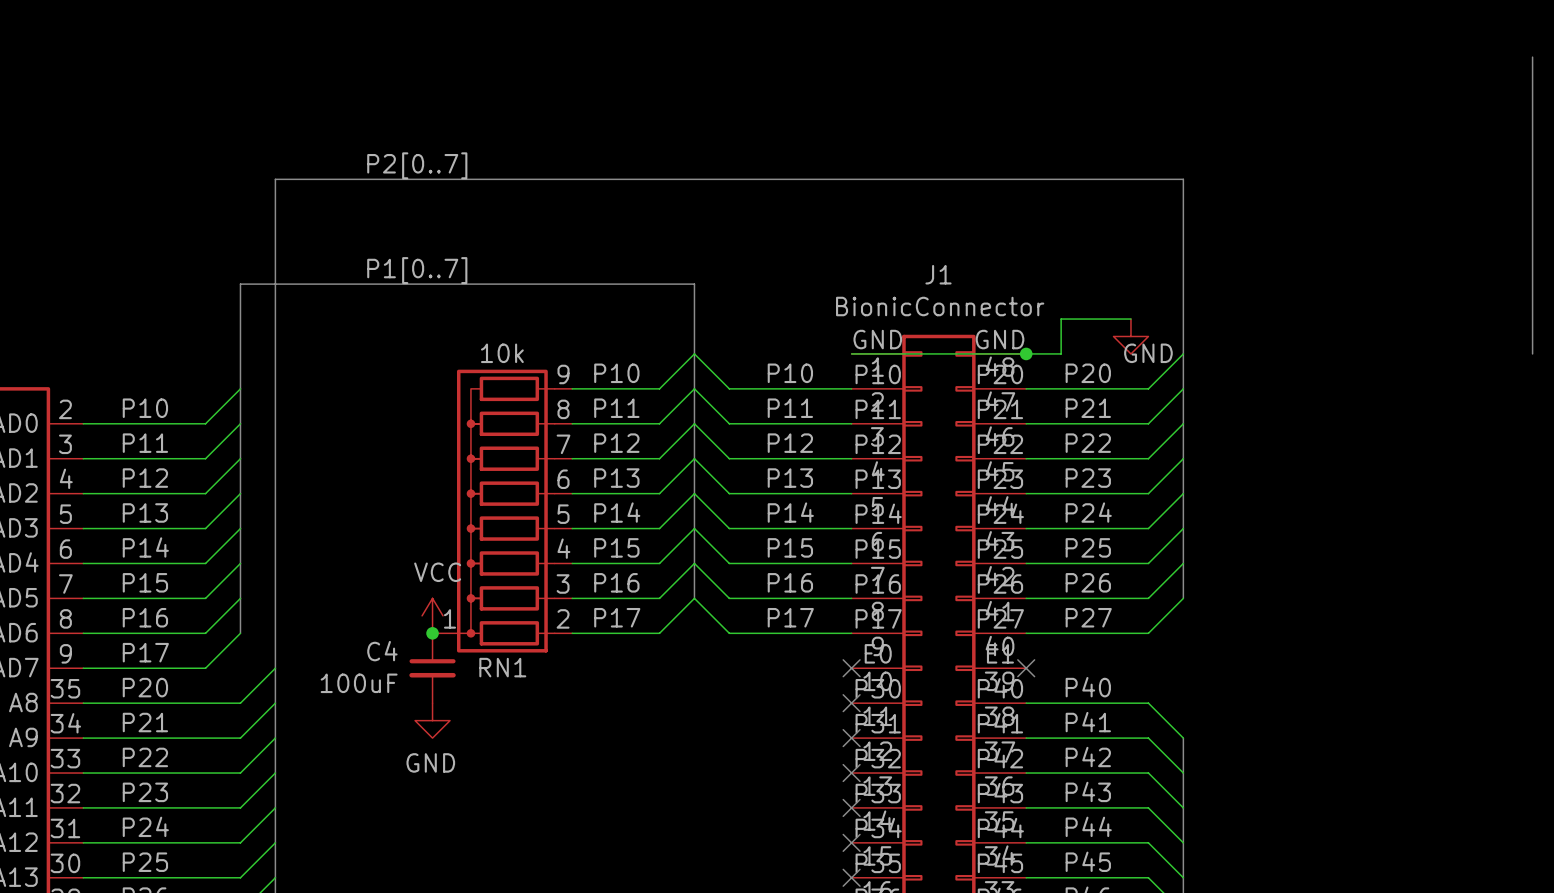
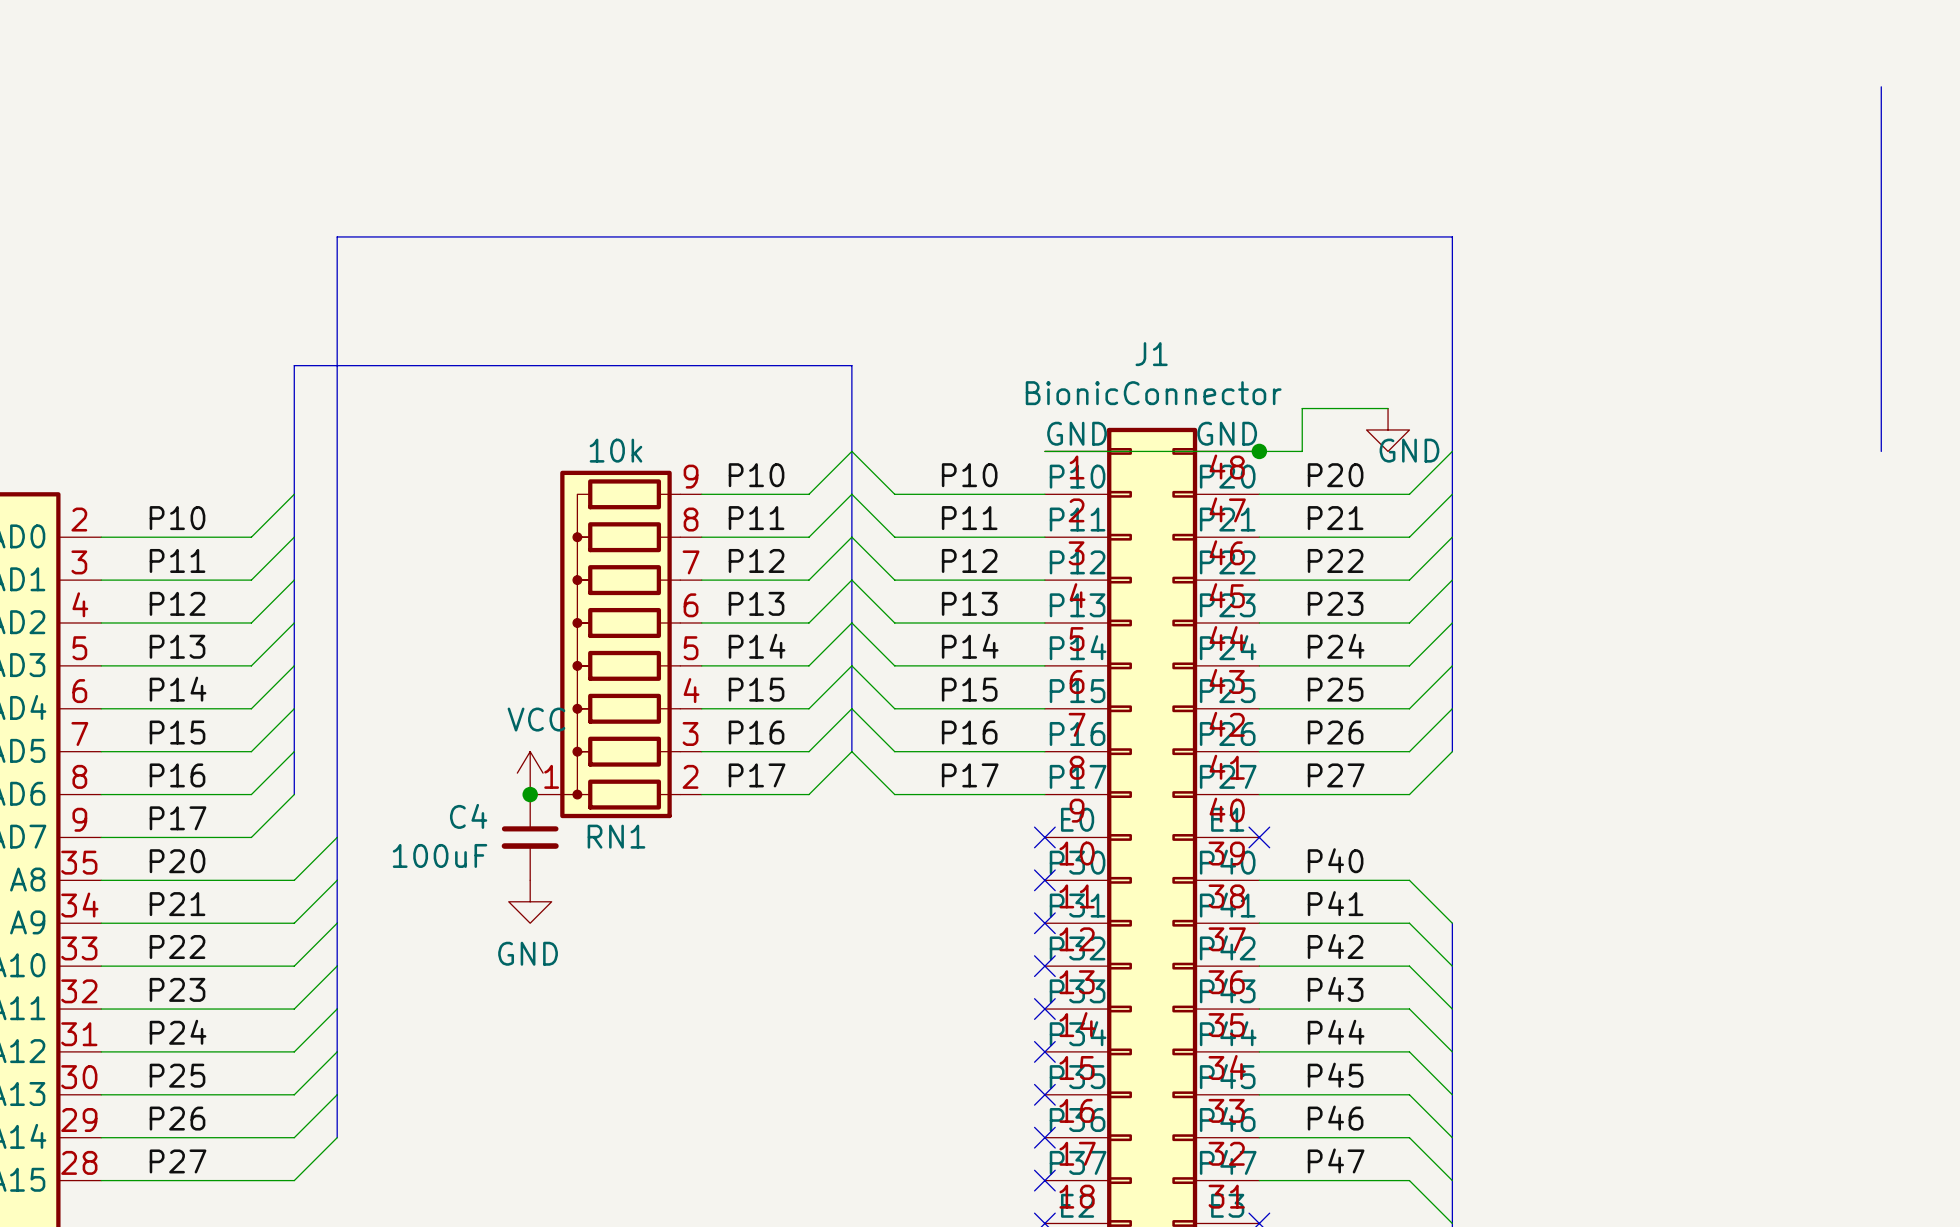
label: P2[0..7] (417, 165) -> none
label: P1[0..7] (417, 270) -> none

